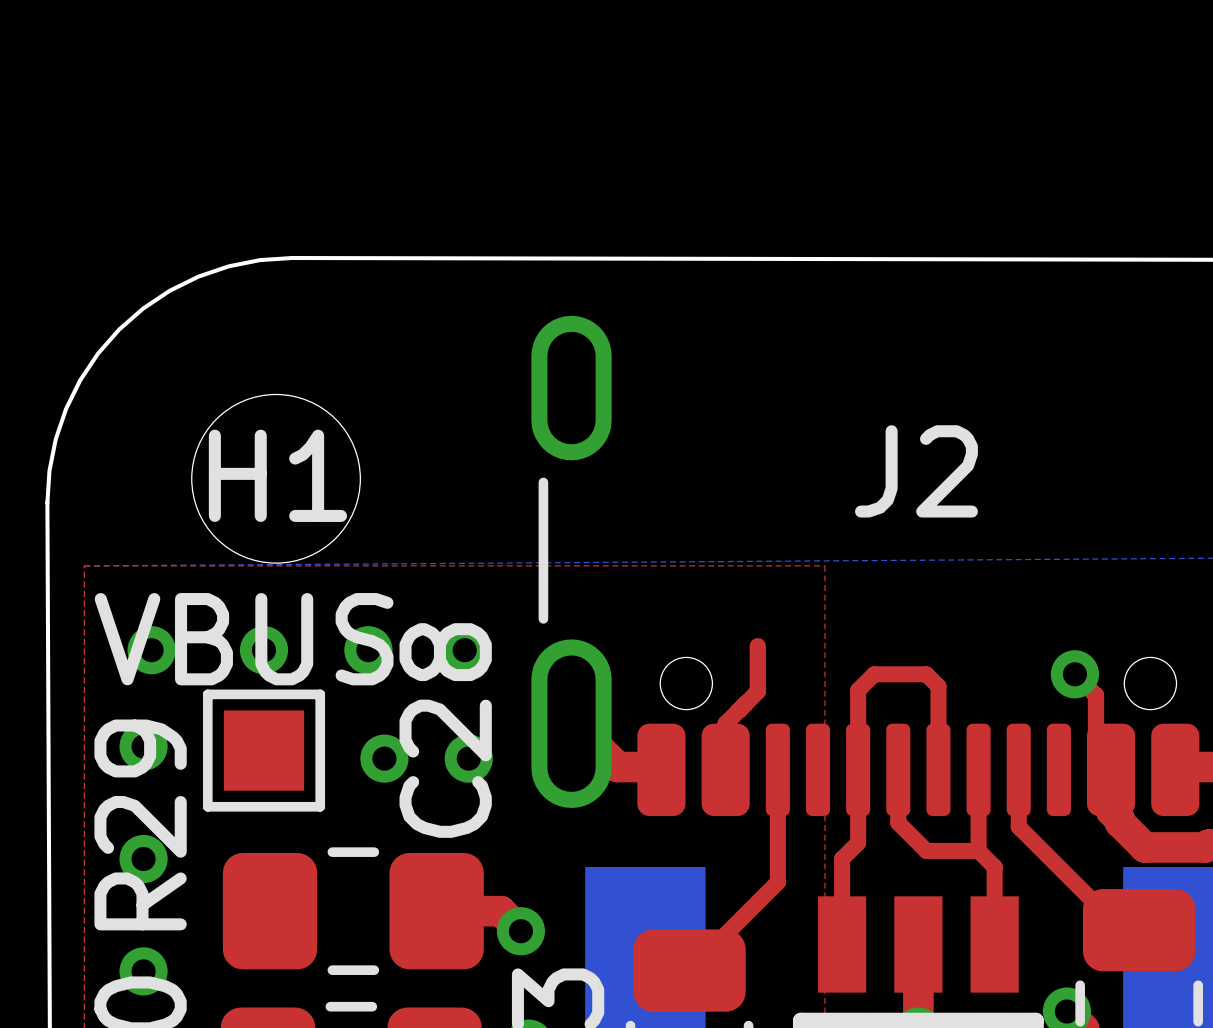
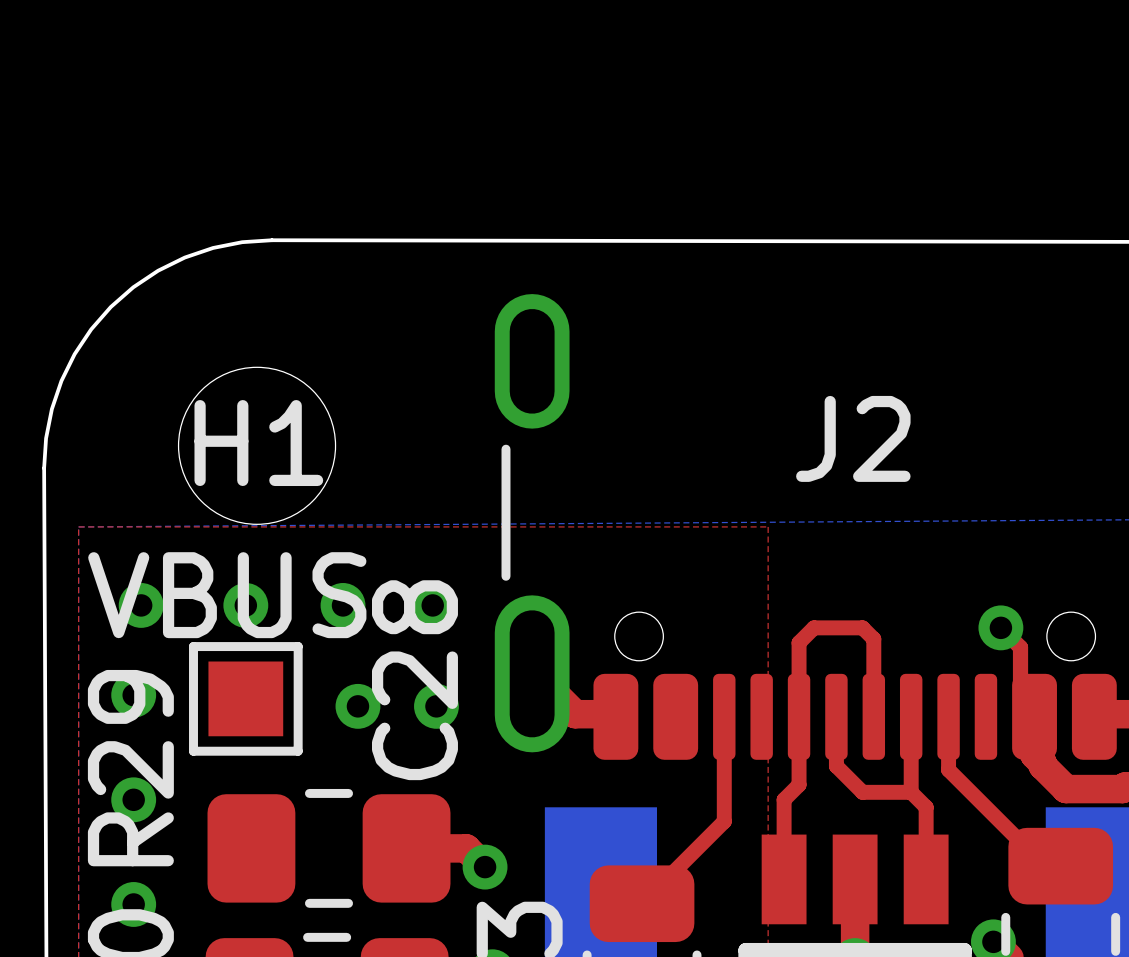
top track: (757, 646) (757, 691) (725, 723) (725, 769) -> none

